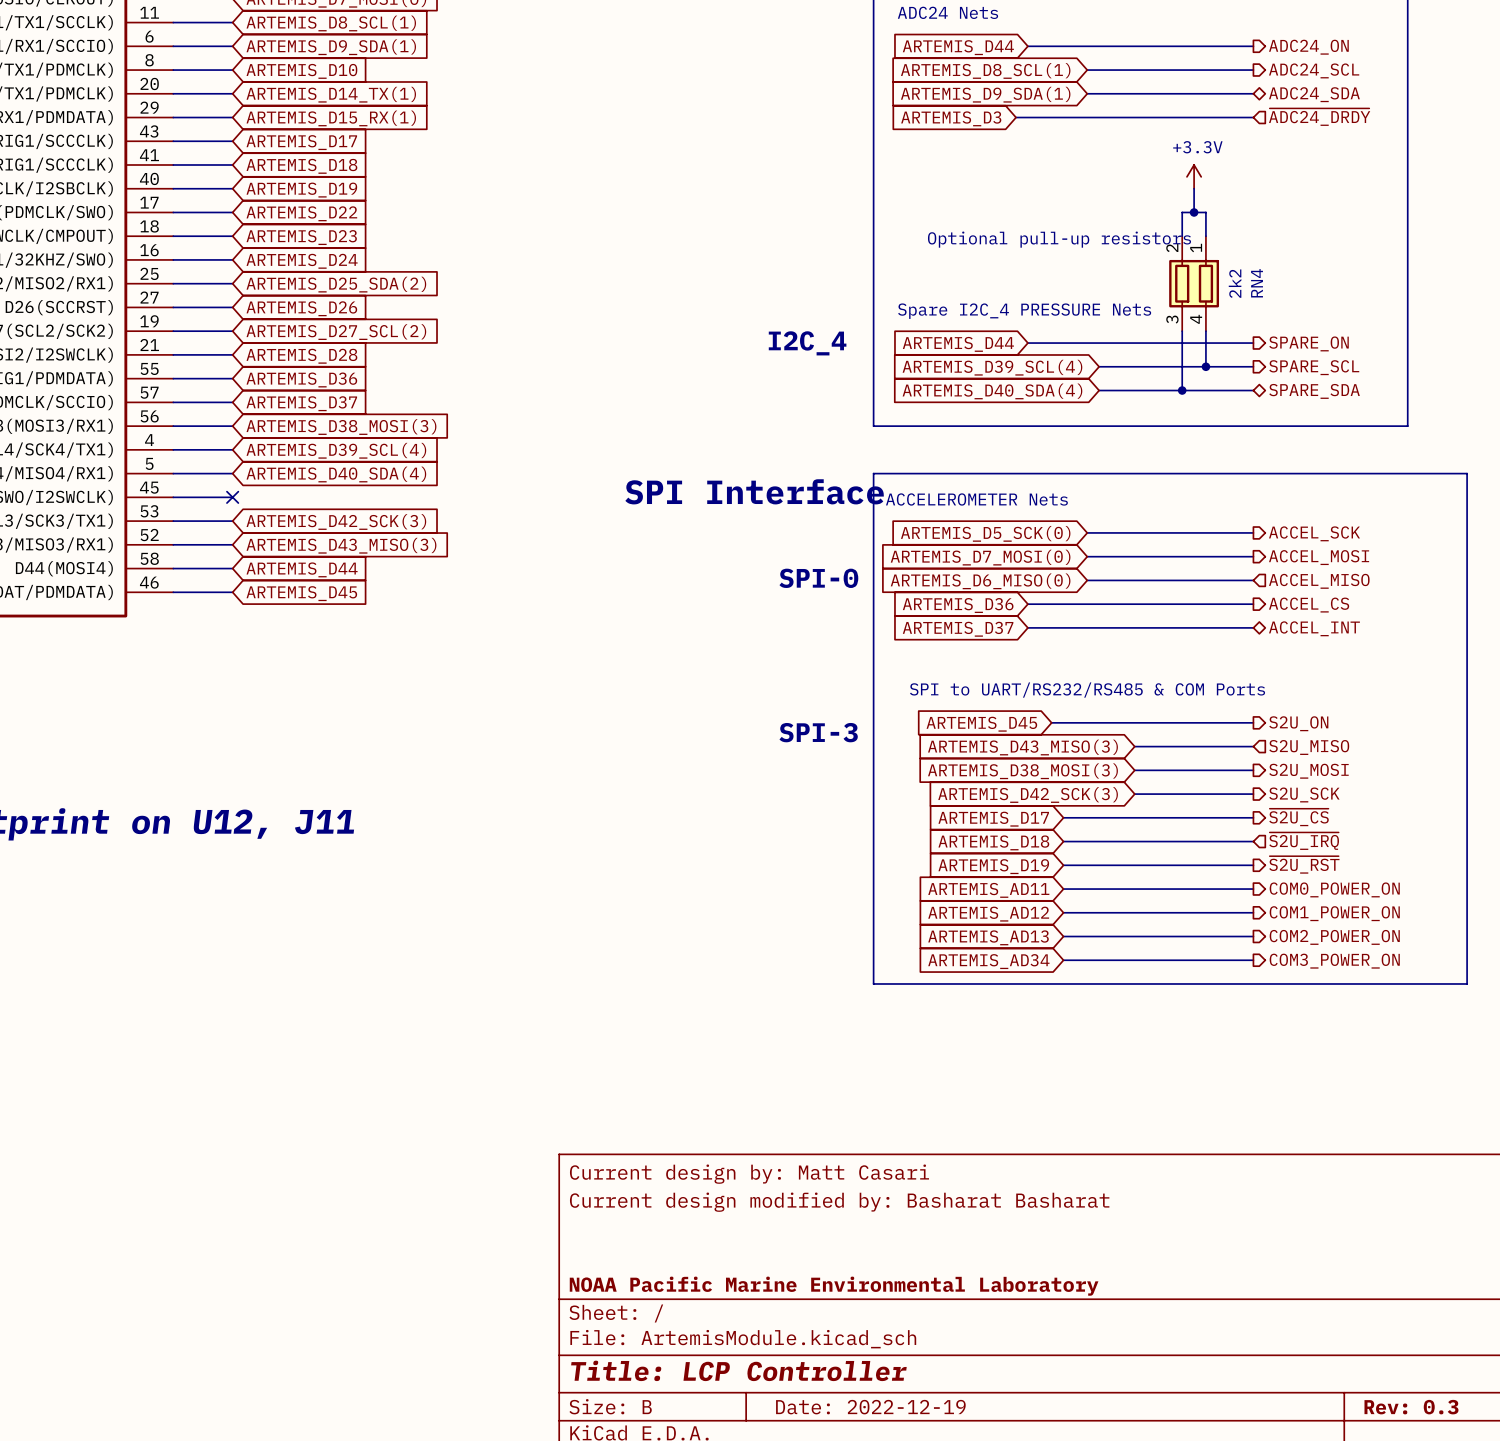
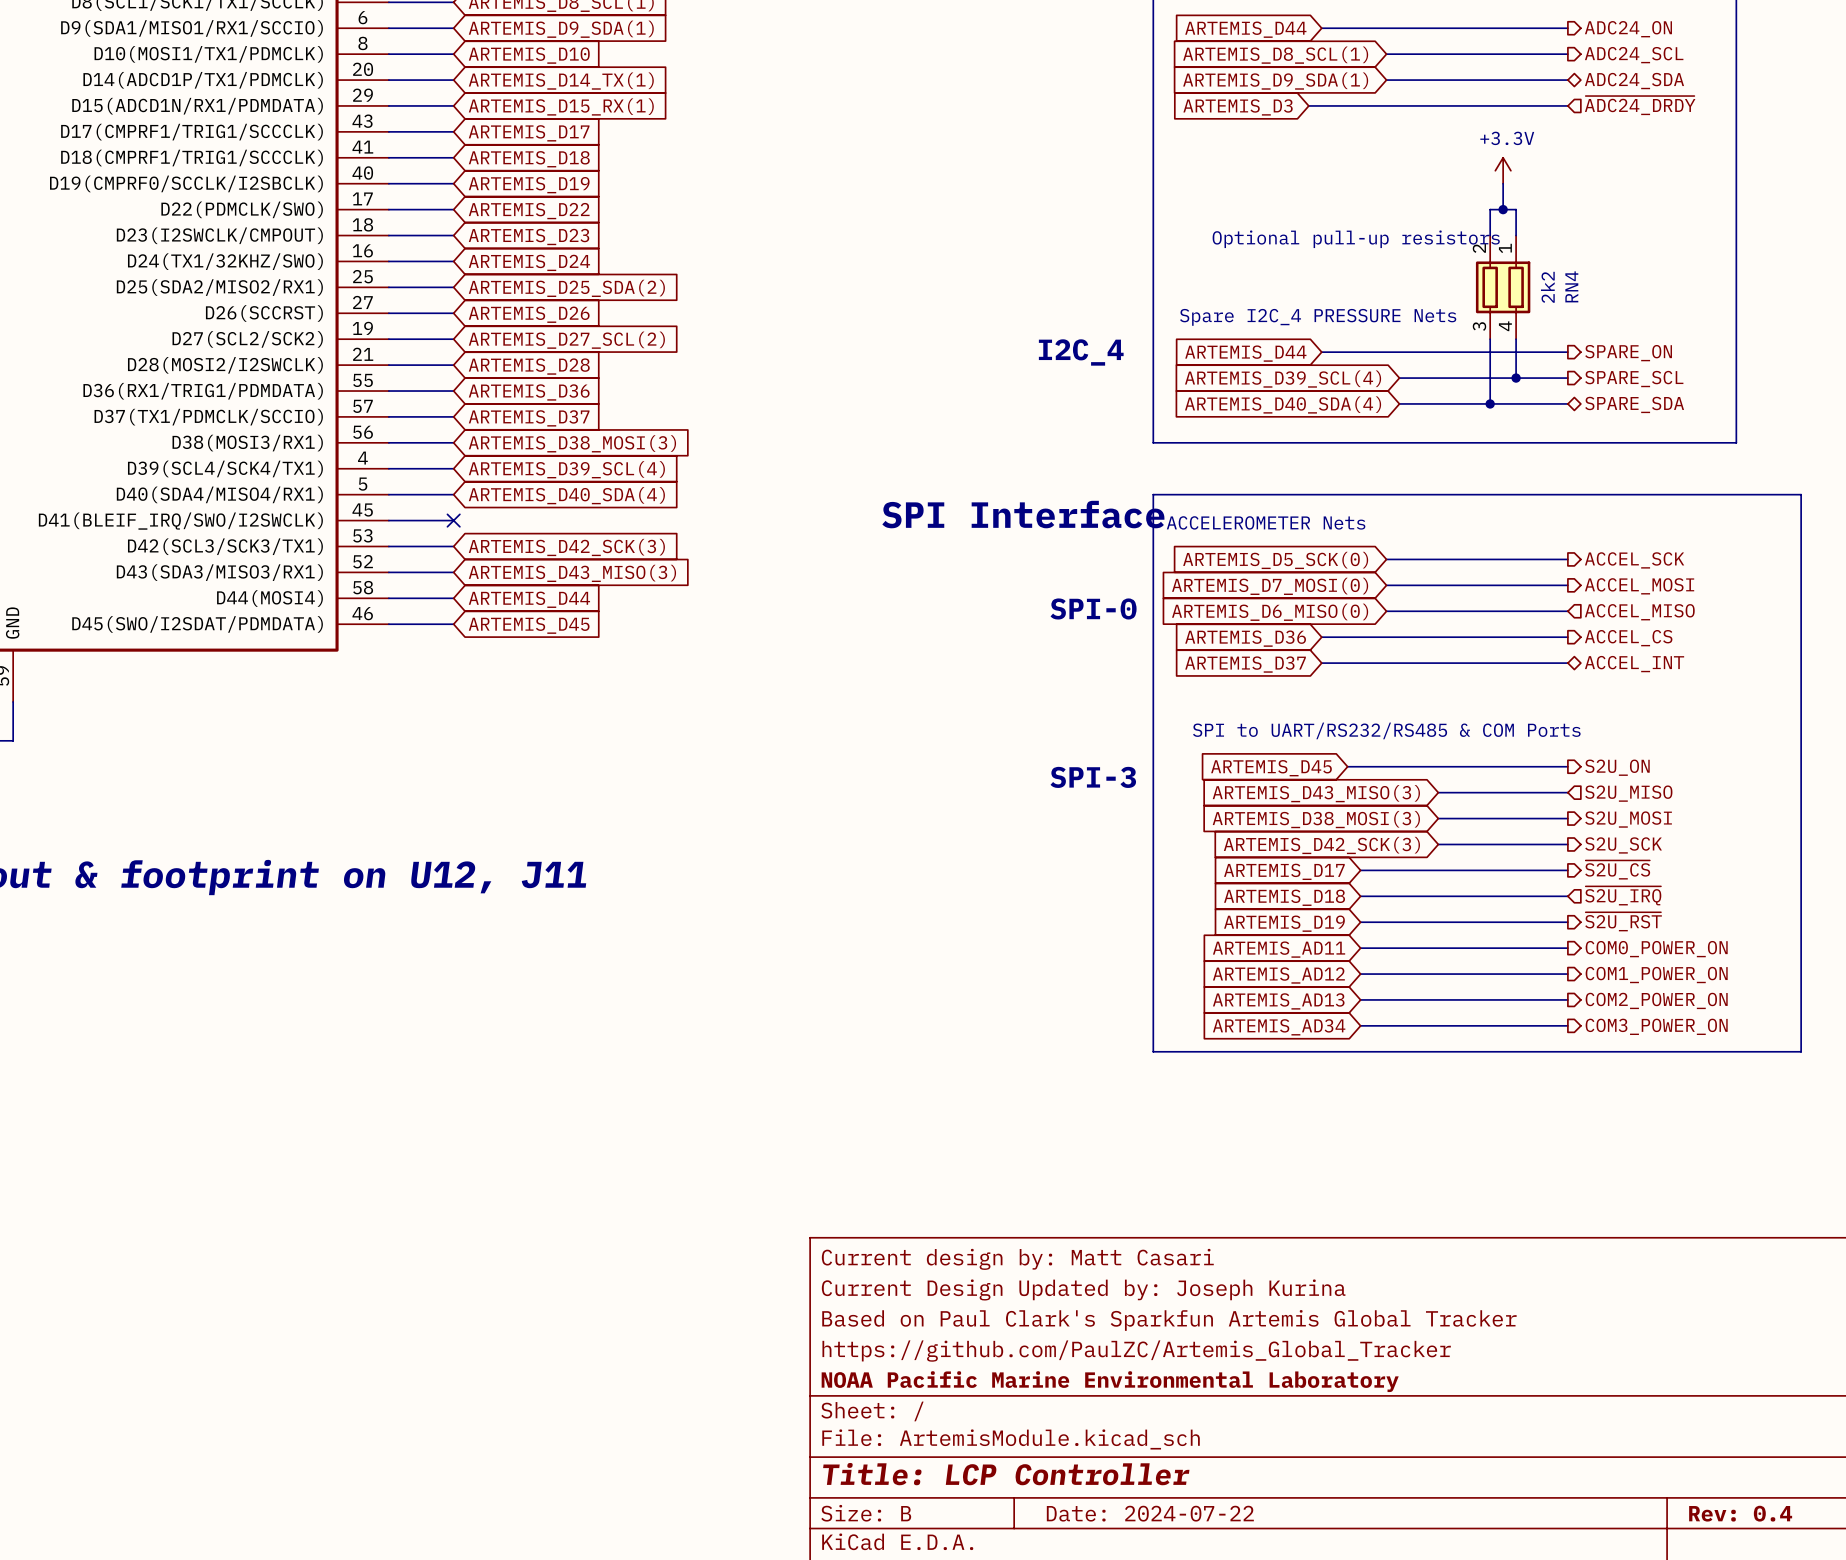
title block: Current design modified by: Basharat Basharat (839, 1202) -> Current Design Updated by: Joseph Kurina (1083, 1289)
title block: none -> Based on Paul Clark's Sparkfun Artemis Global Tracker (1169, 1320)
title block: none -> https://github.com/PaulZC/Artemis_Global_Tracker (1136, 1351)
title block: Date: 2022-12-19 (870, 1407) -> Date: 2024-07-22 (1150, 1513)
title block: Rev: 0.3 (1411, 1407) -> Rev: 0.4 (1740, 1513)

